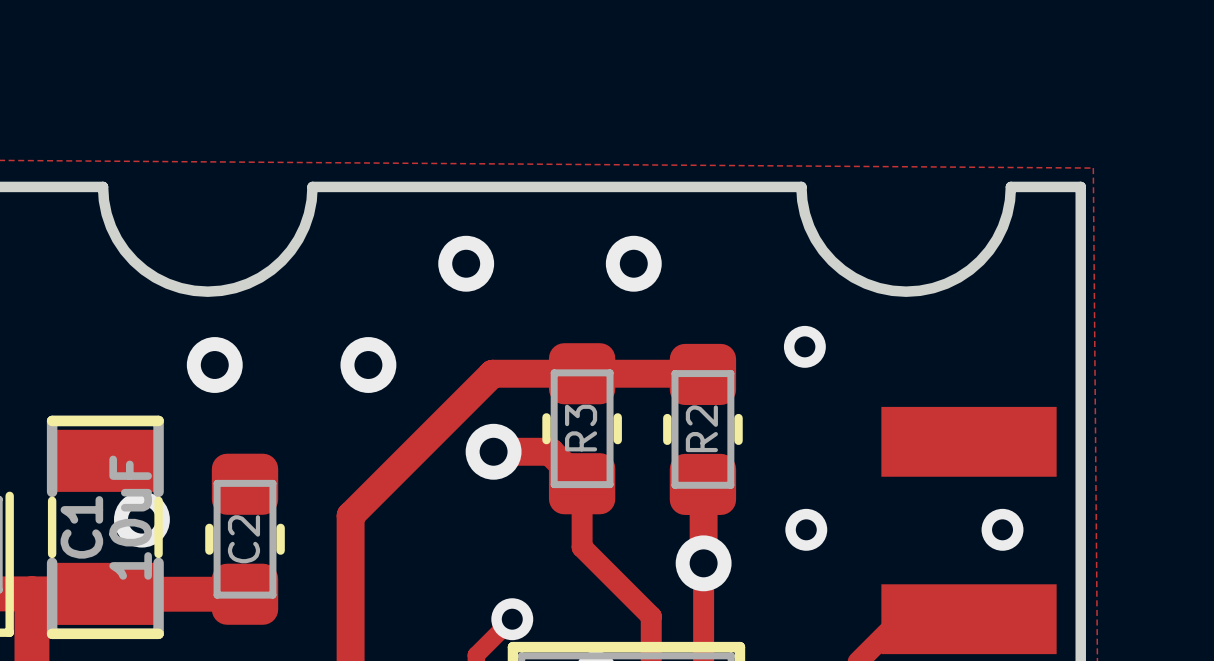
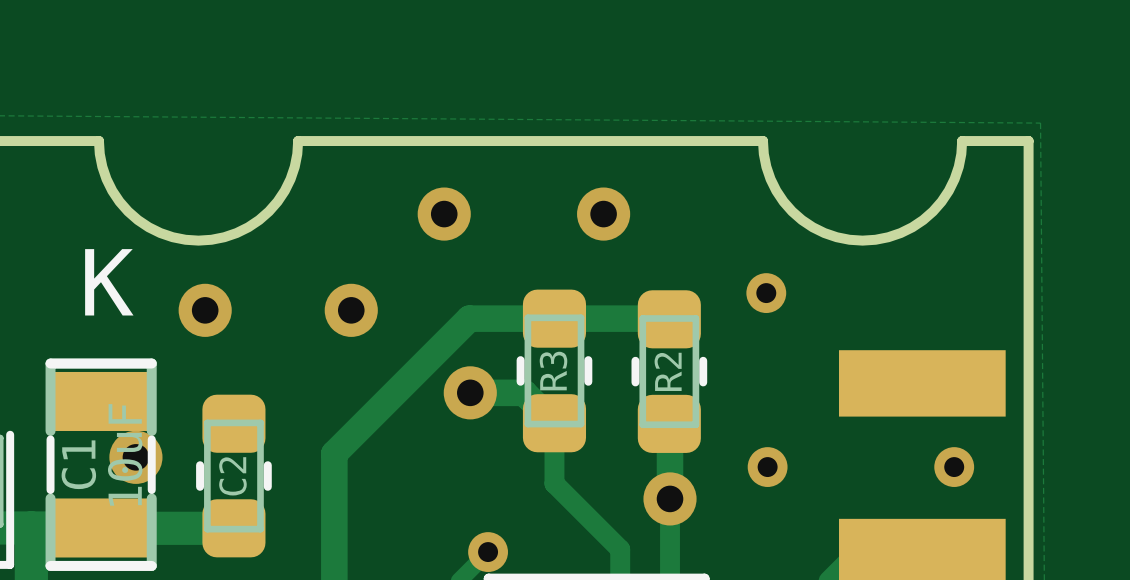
text: none -> K (109, 282)

